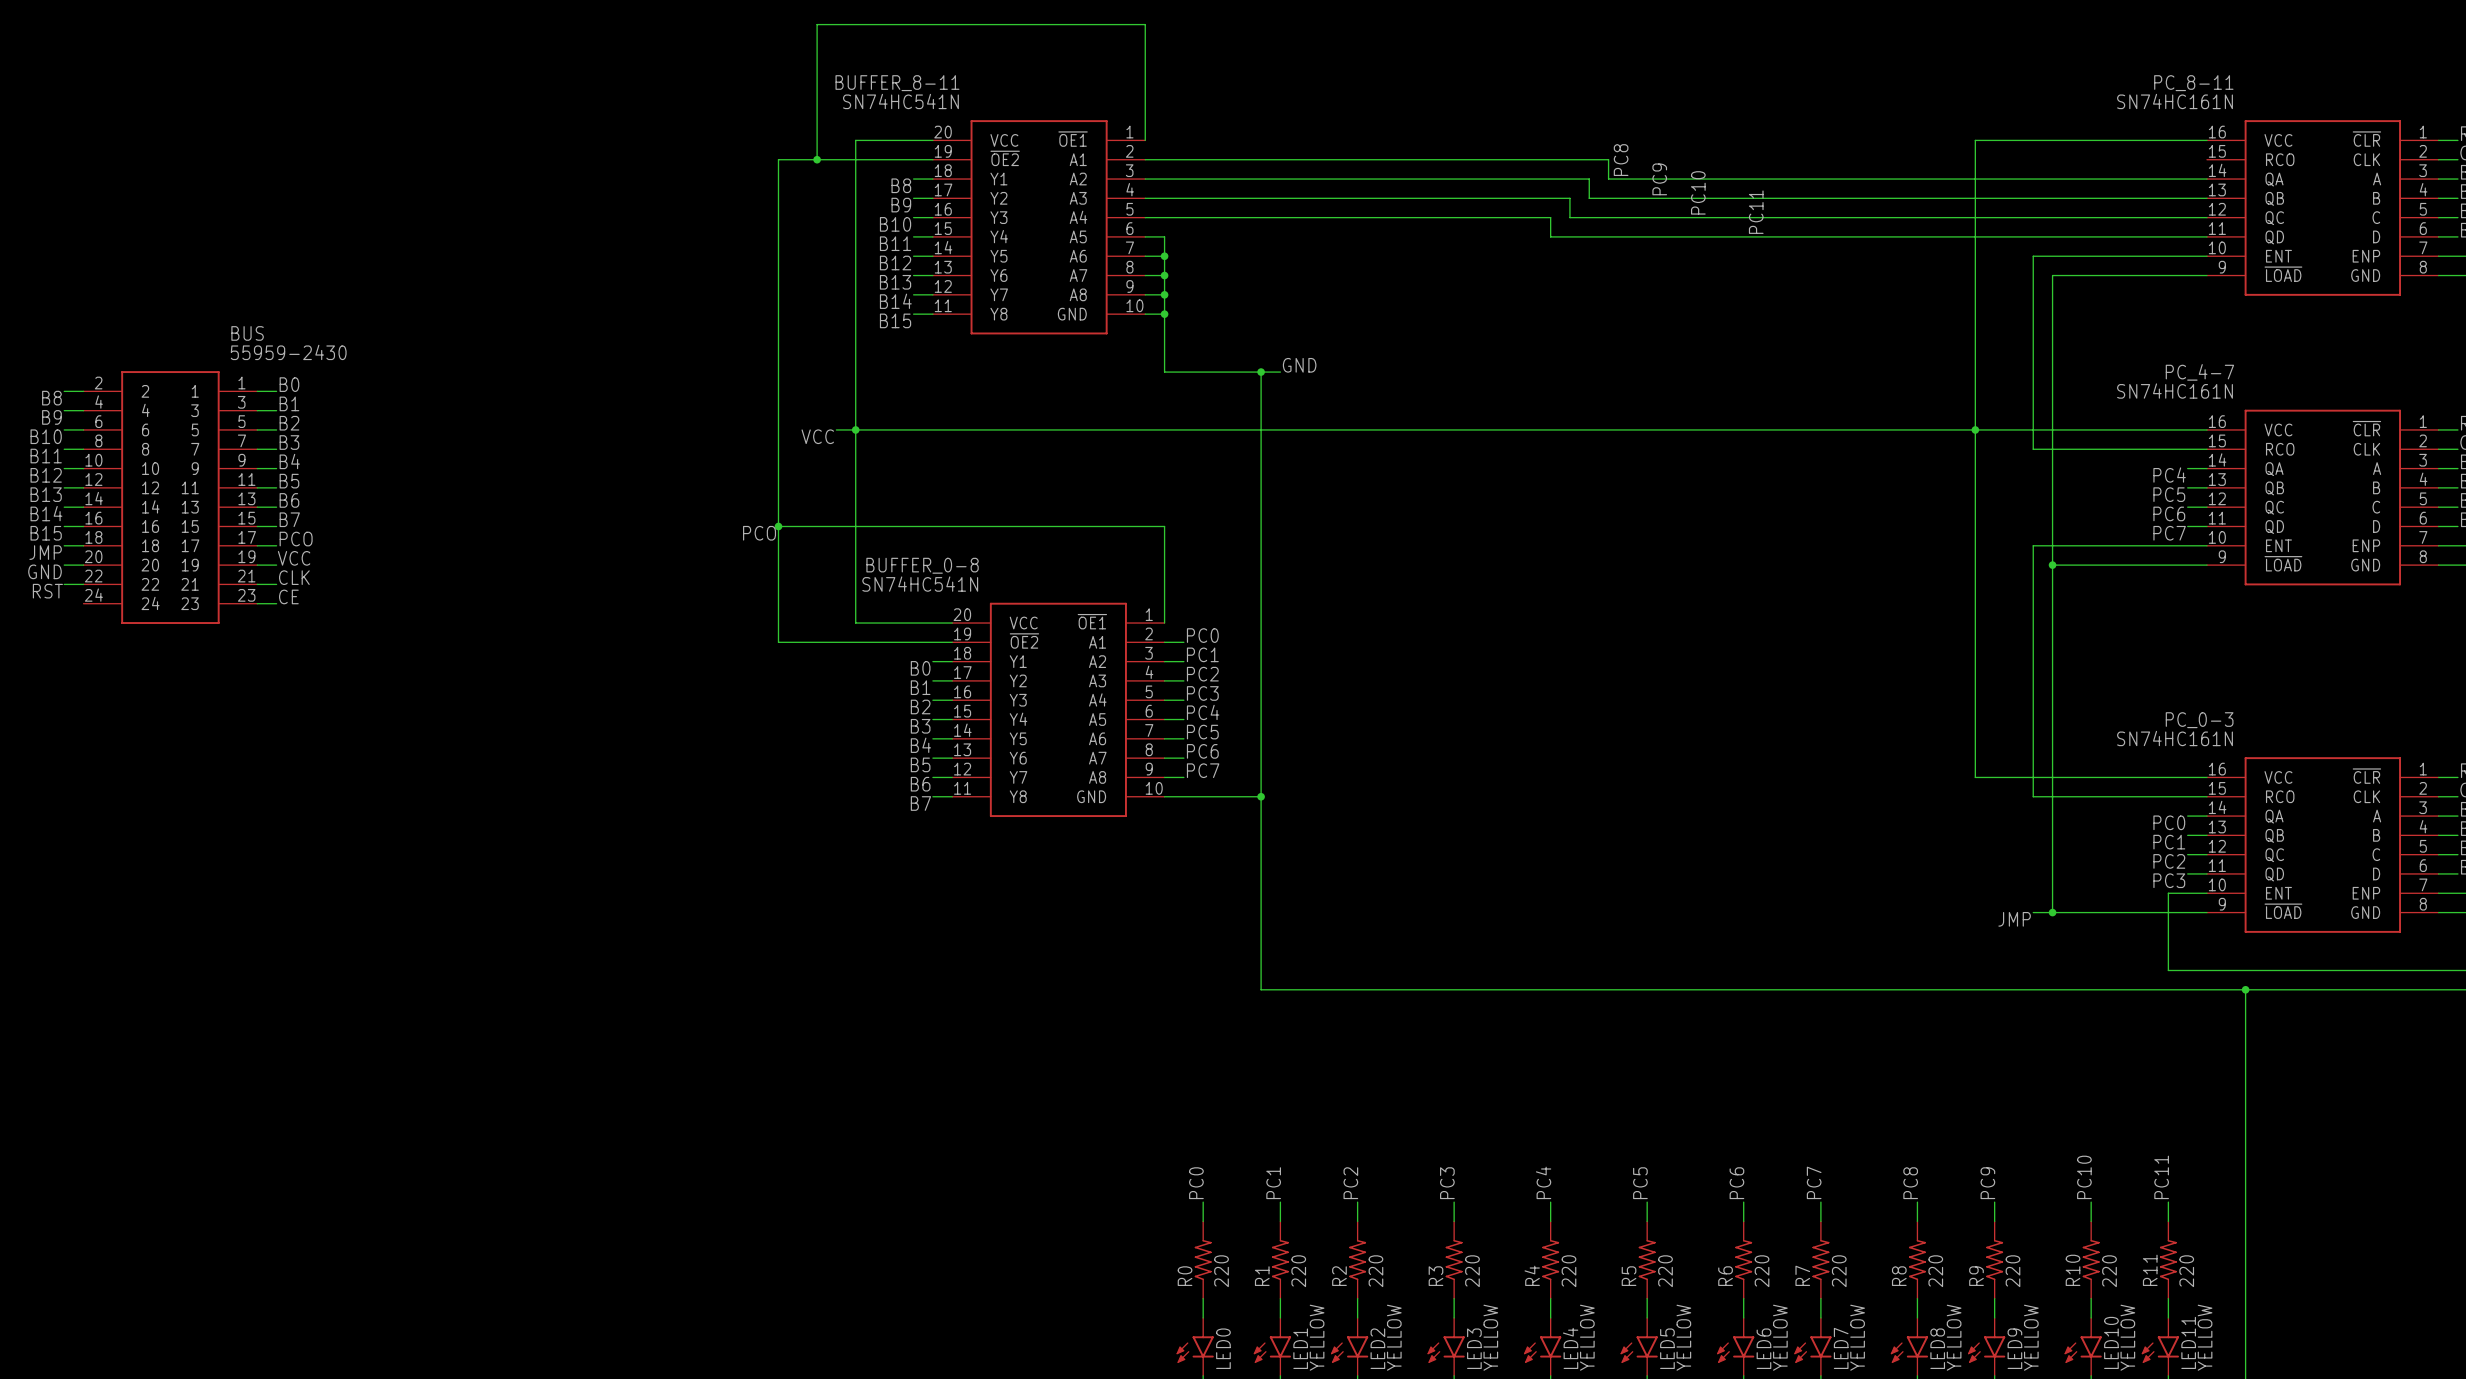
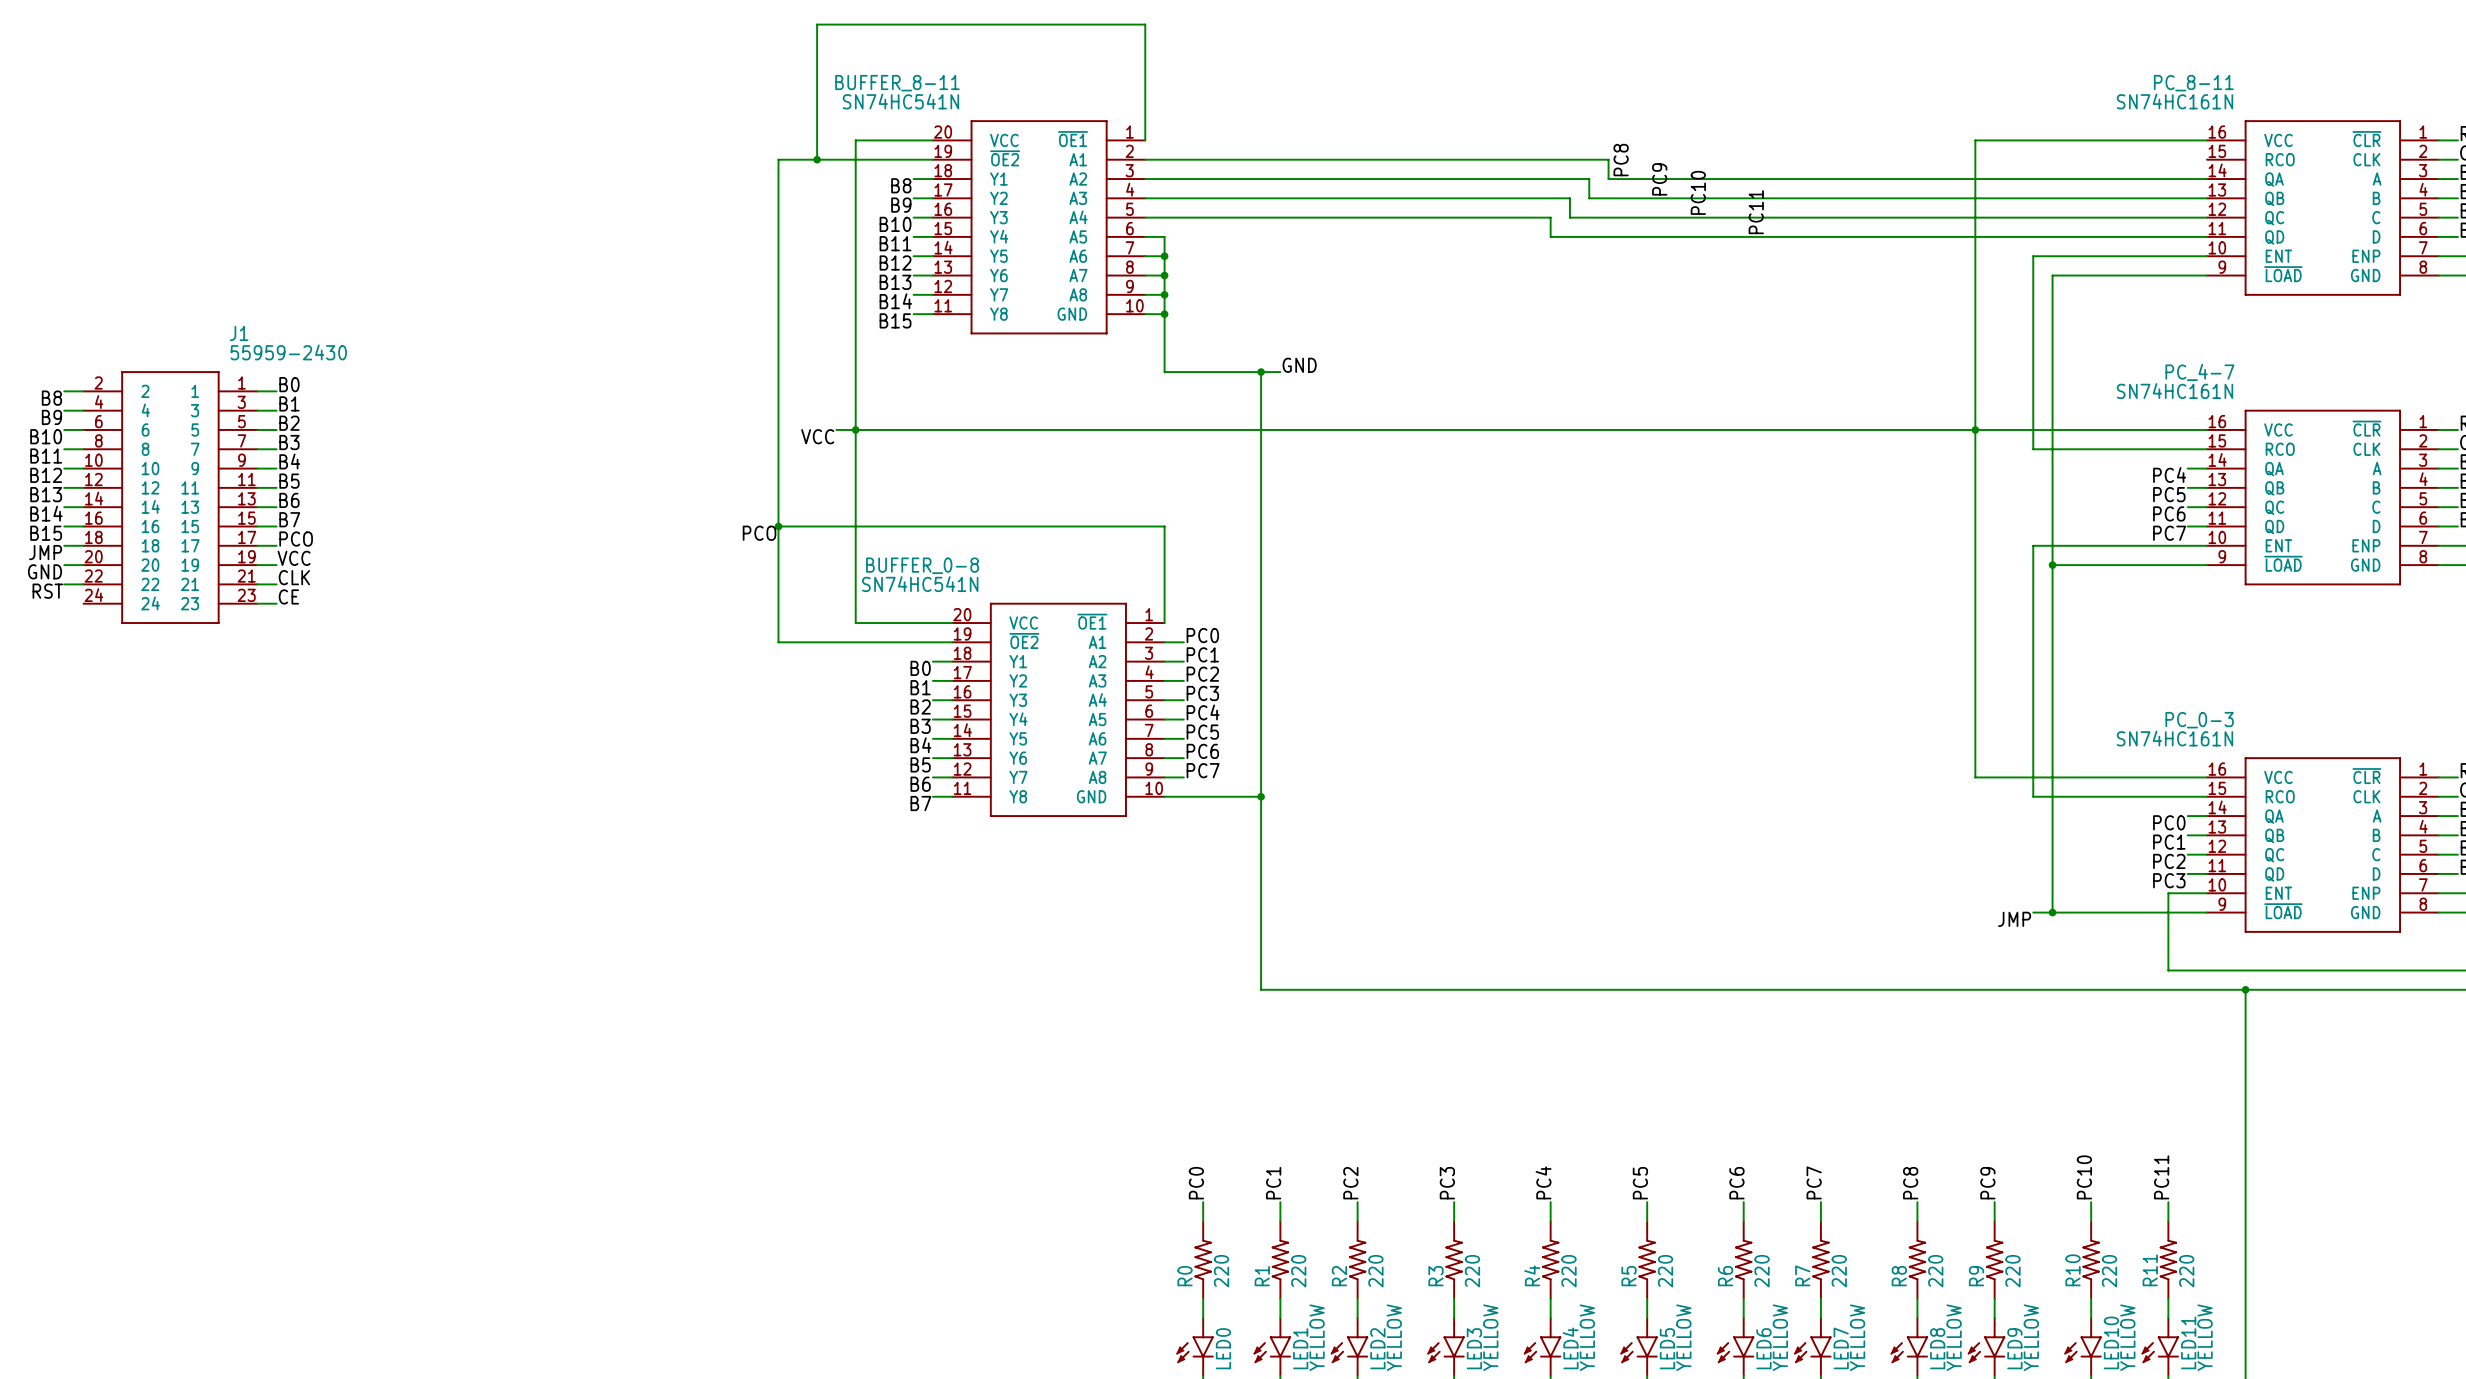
BUS name: BUS (247, 333) -> J1 (239, 333)

